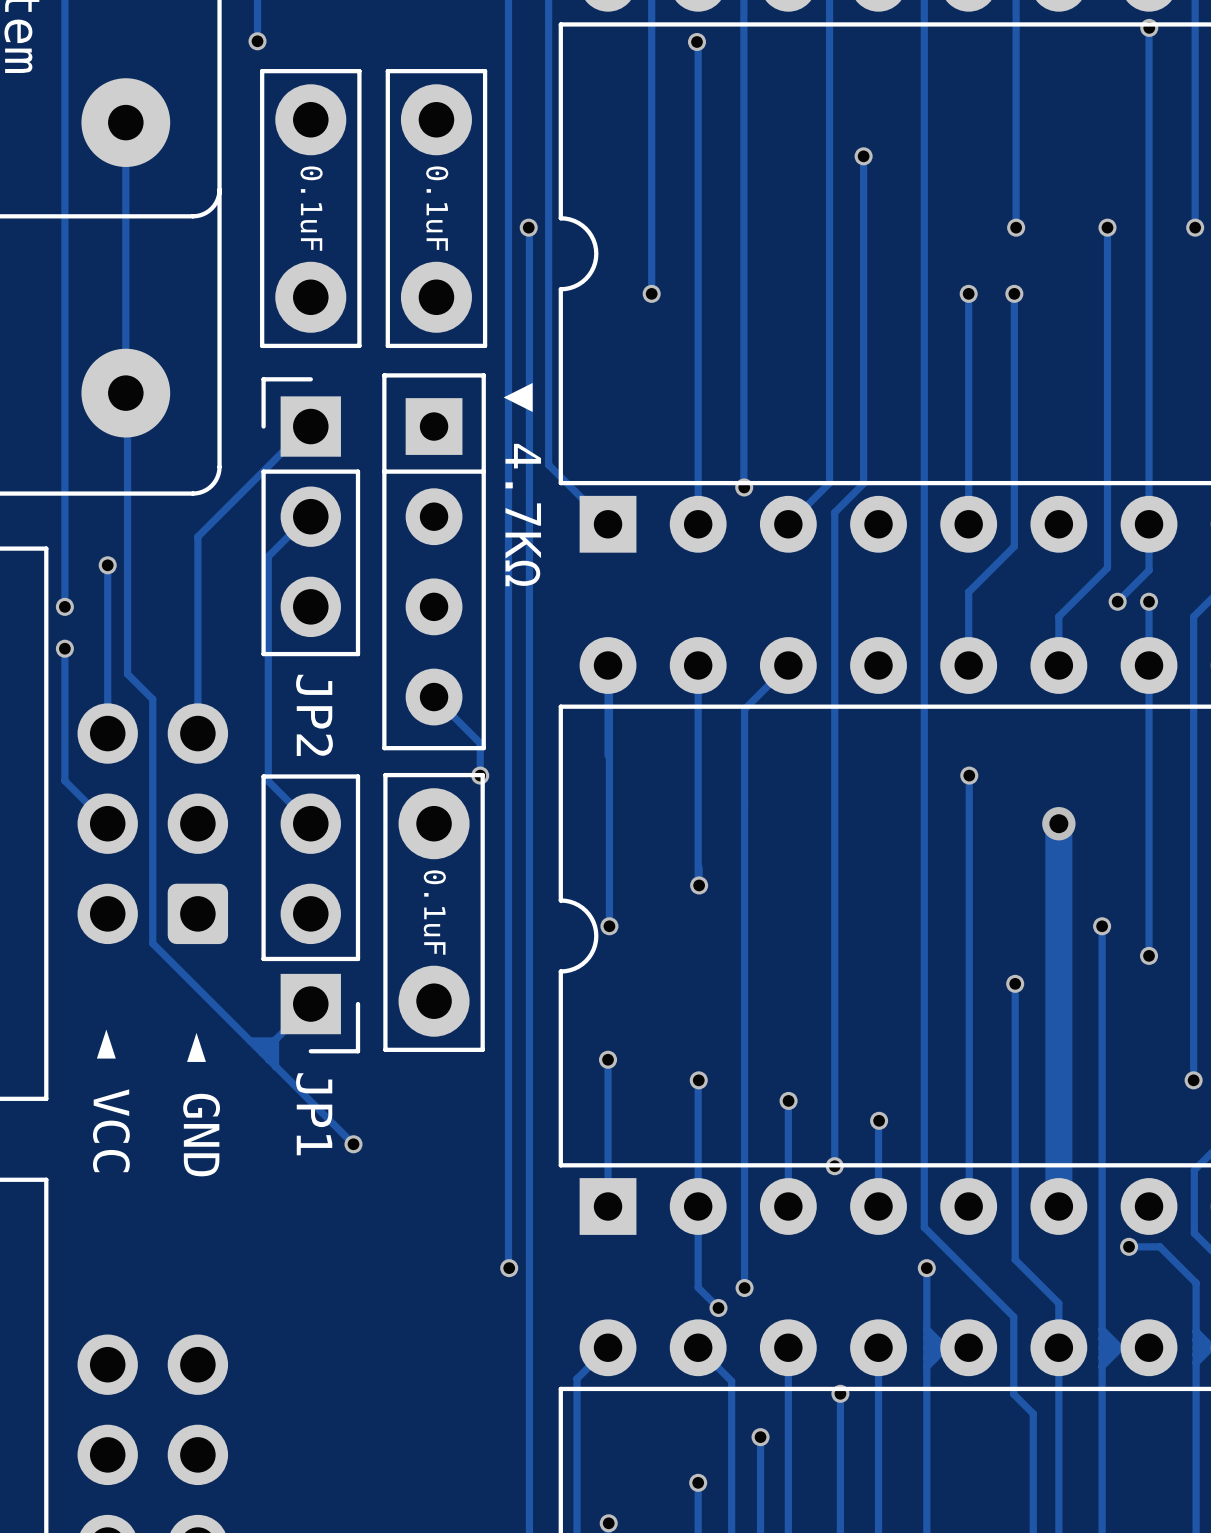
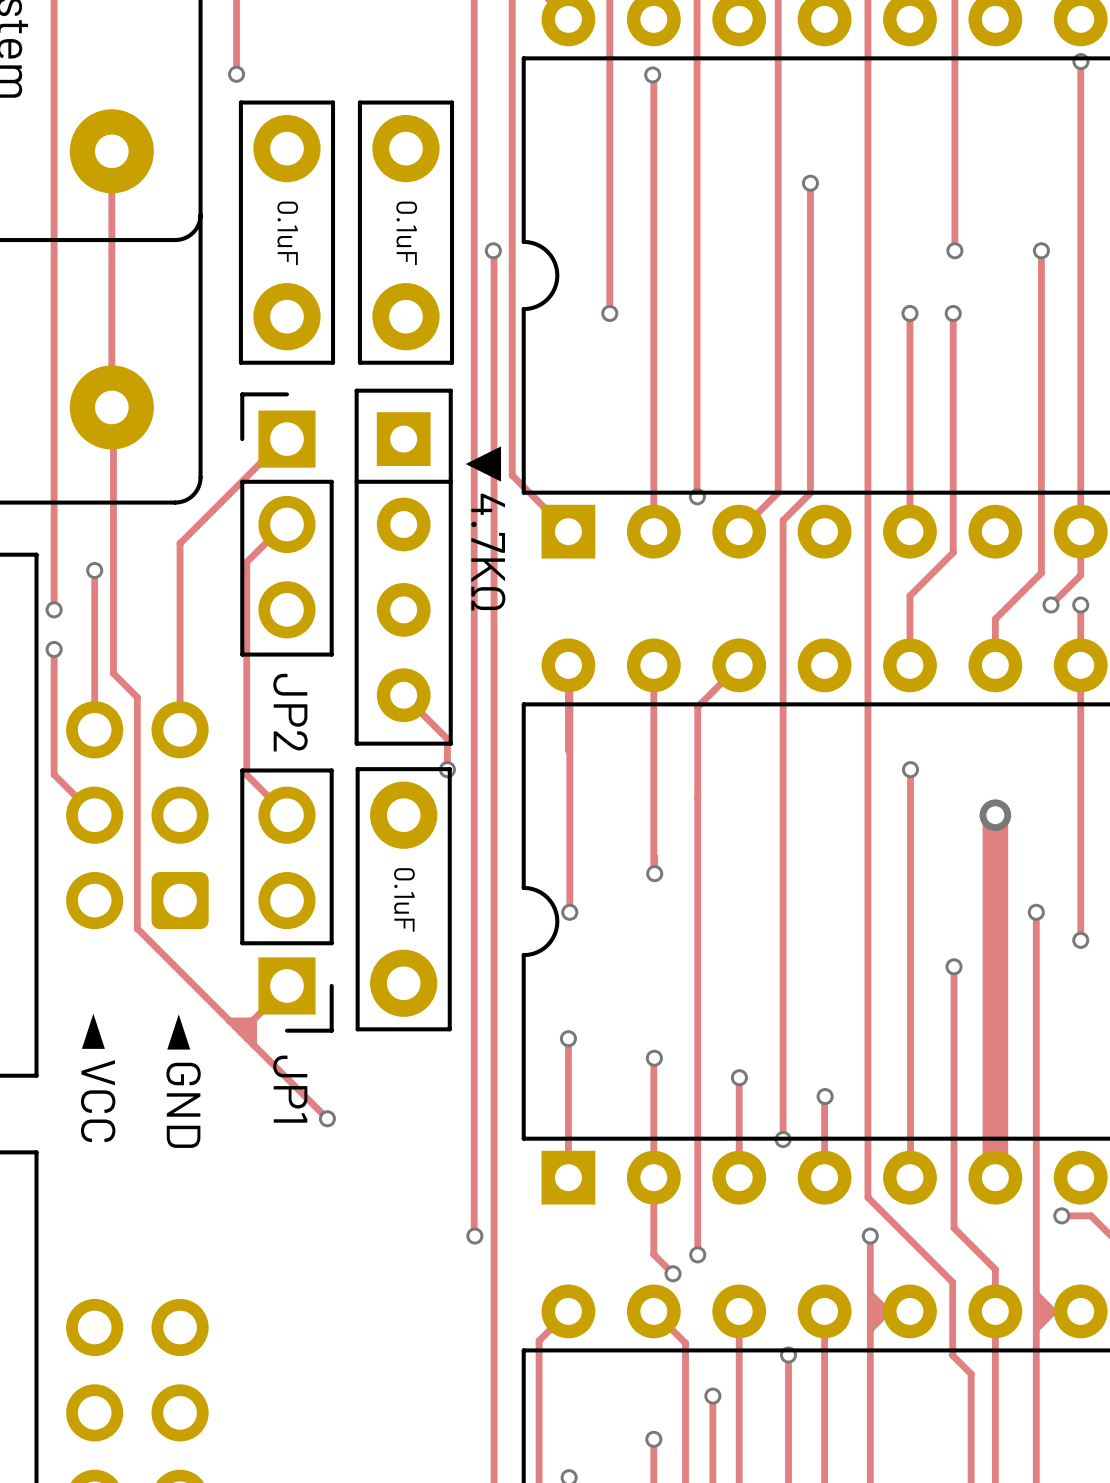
▼ 4.7KΩ name position: ▼ 4.7KΩ (522, 484) -> ▼ 4.7KΩ (485, 528)

